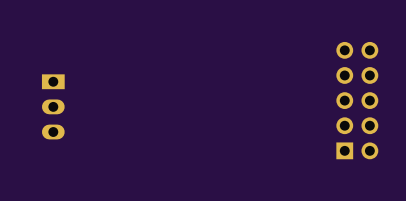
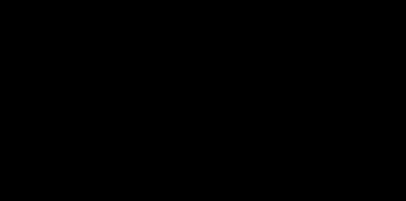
part: (357, 100) -> none
part: (53, 106) -> none

